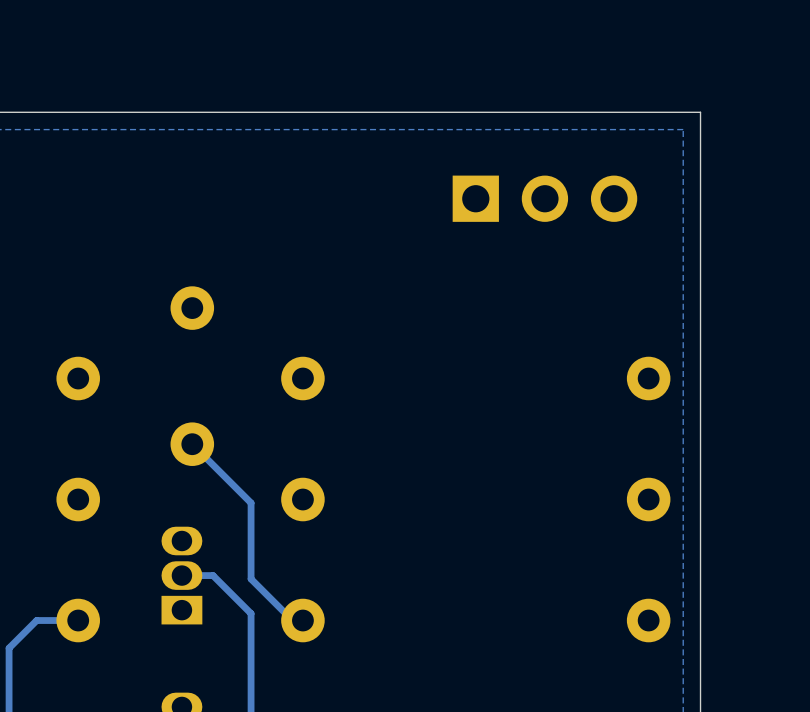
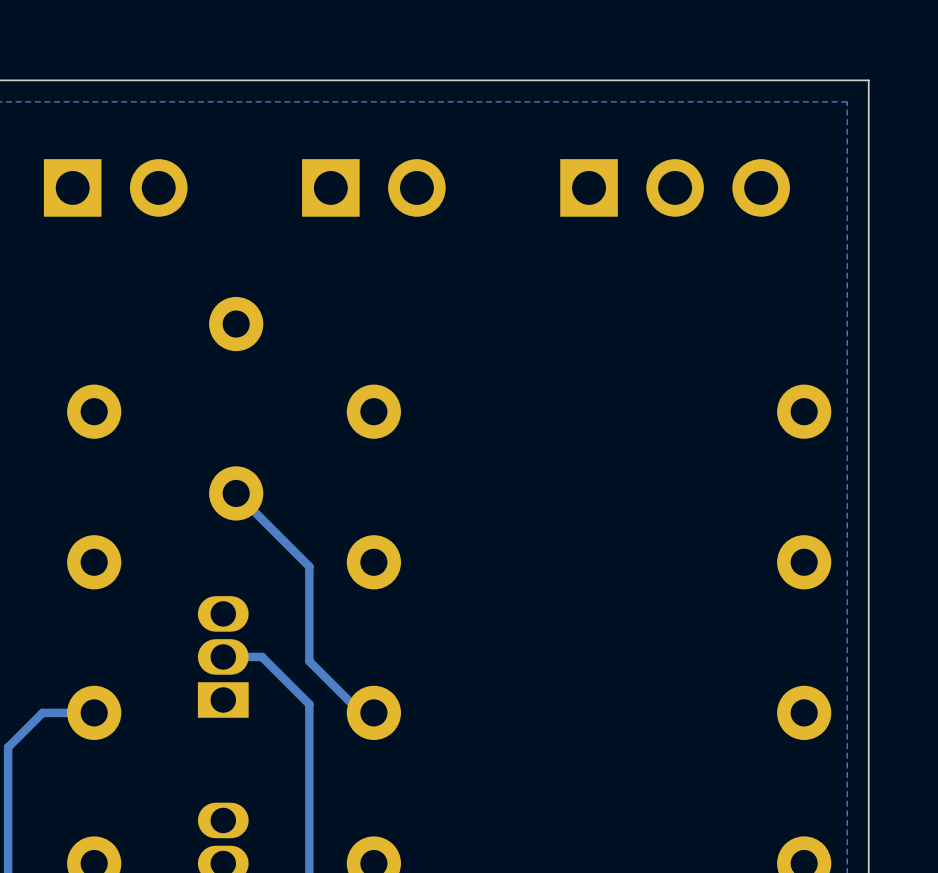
part: none -> (115, 187)
part: none -> (373, 187)

